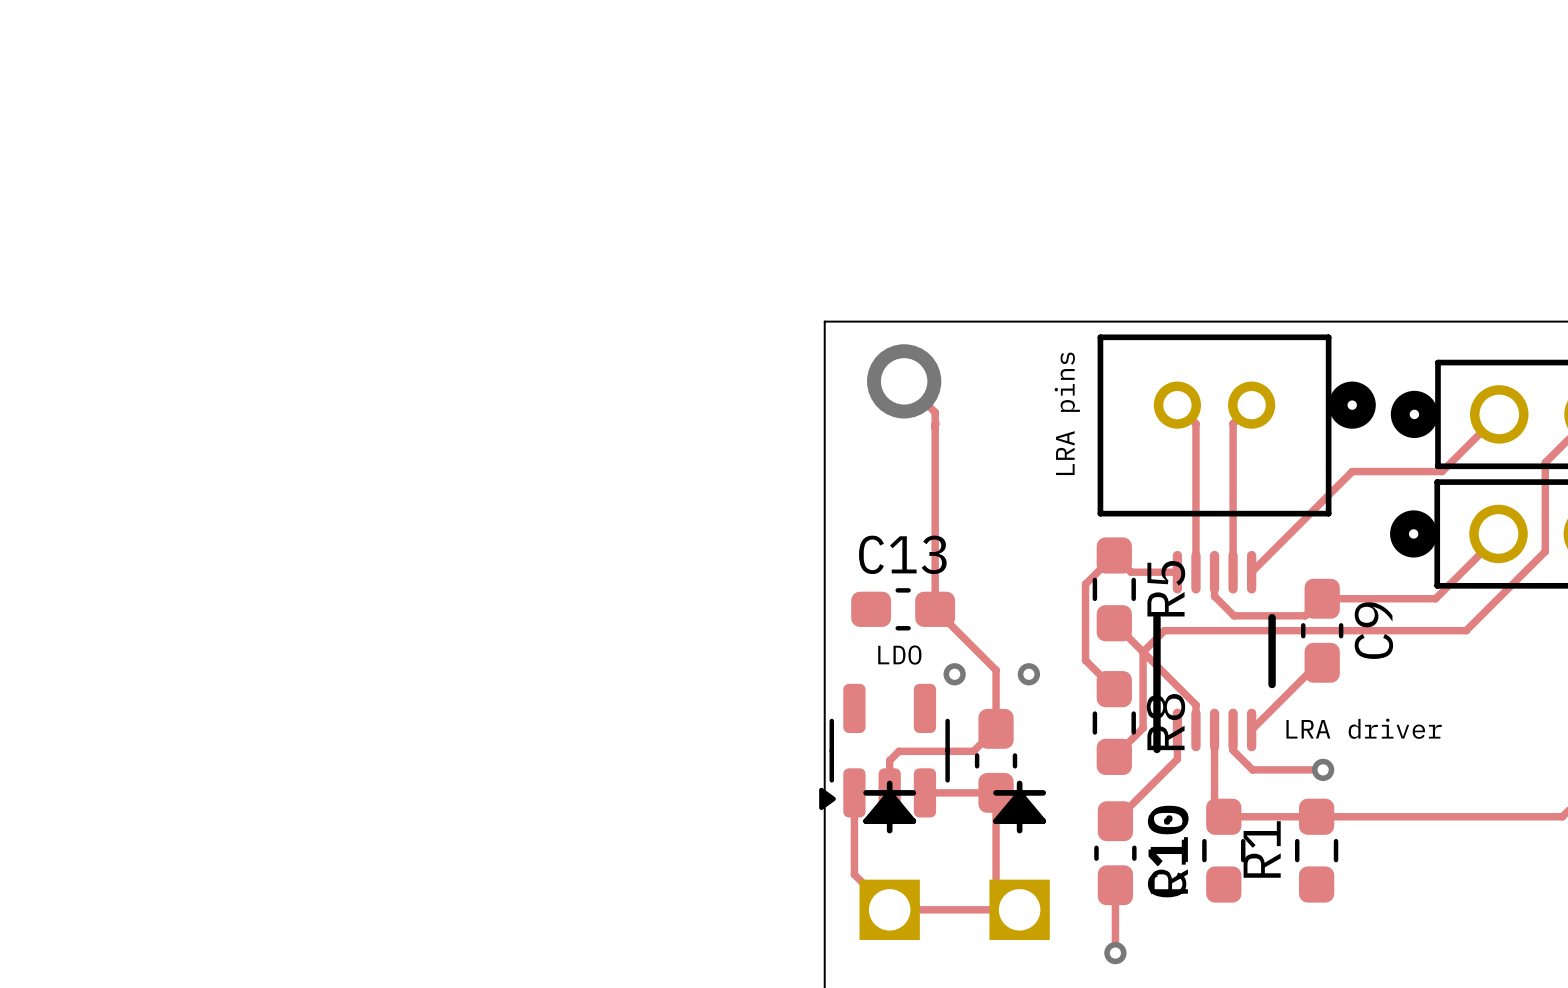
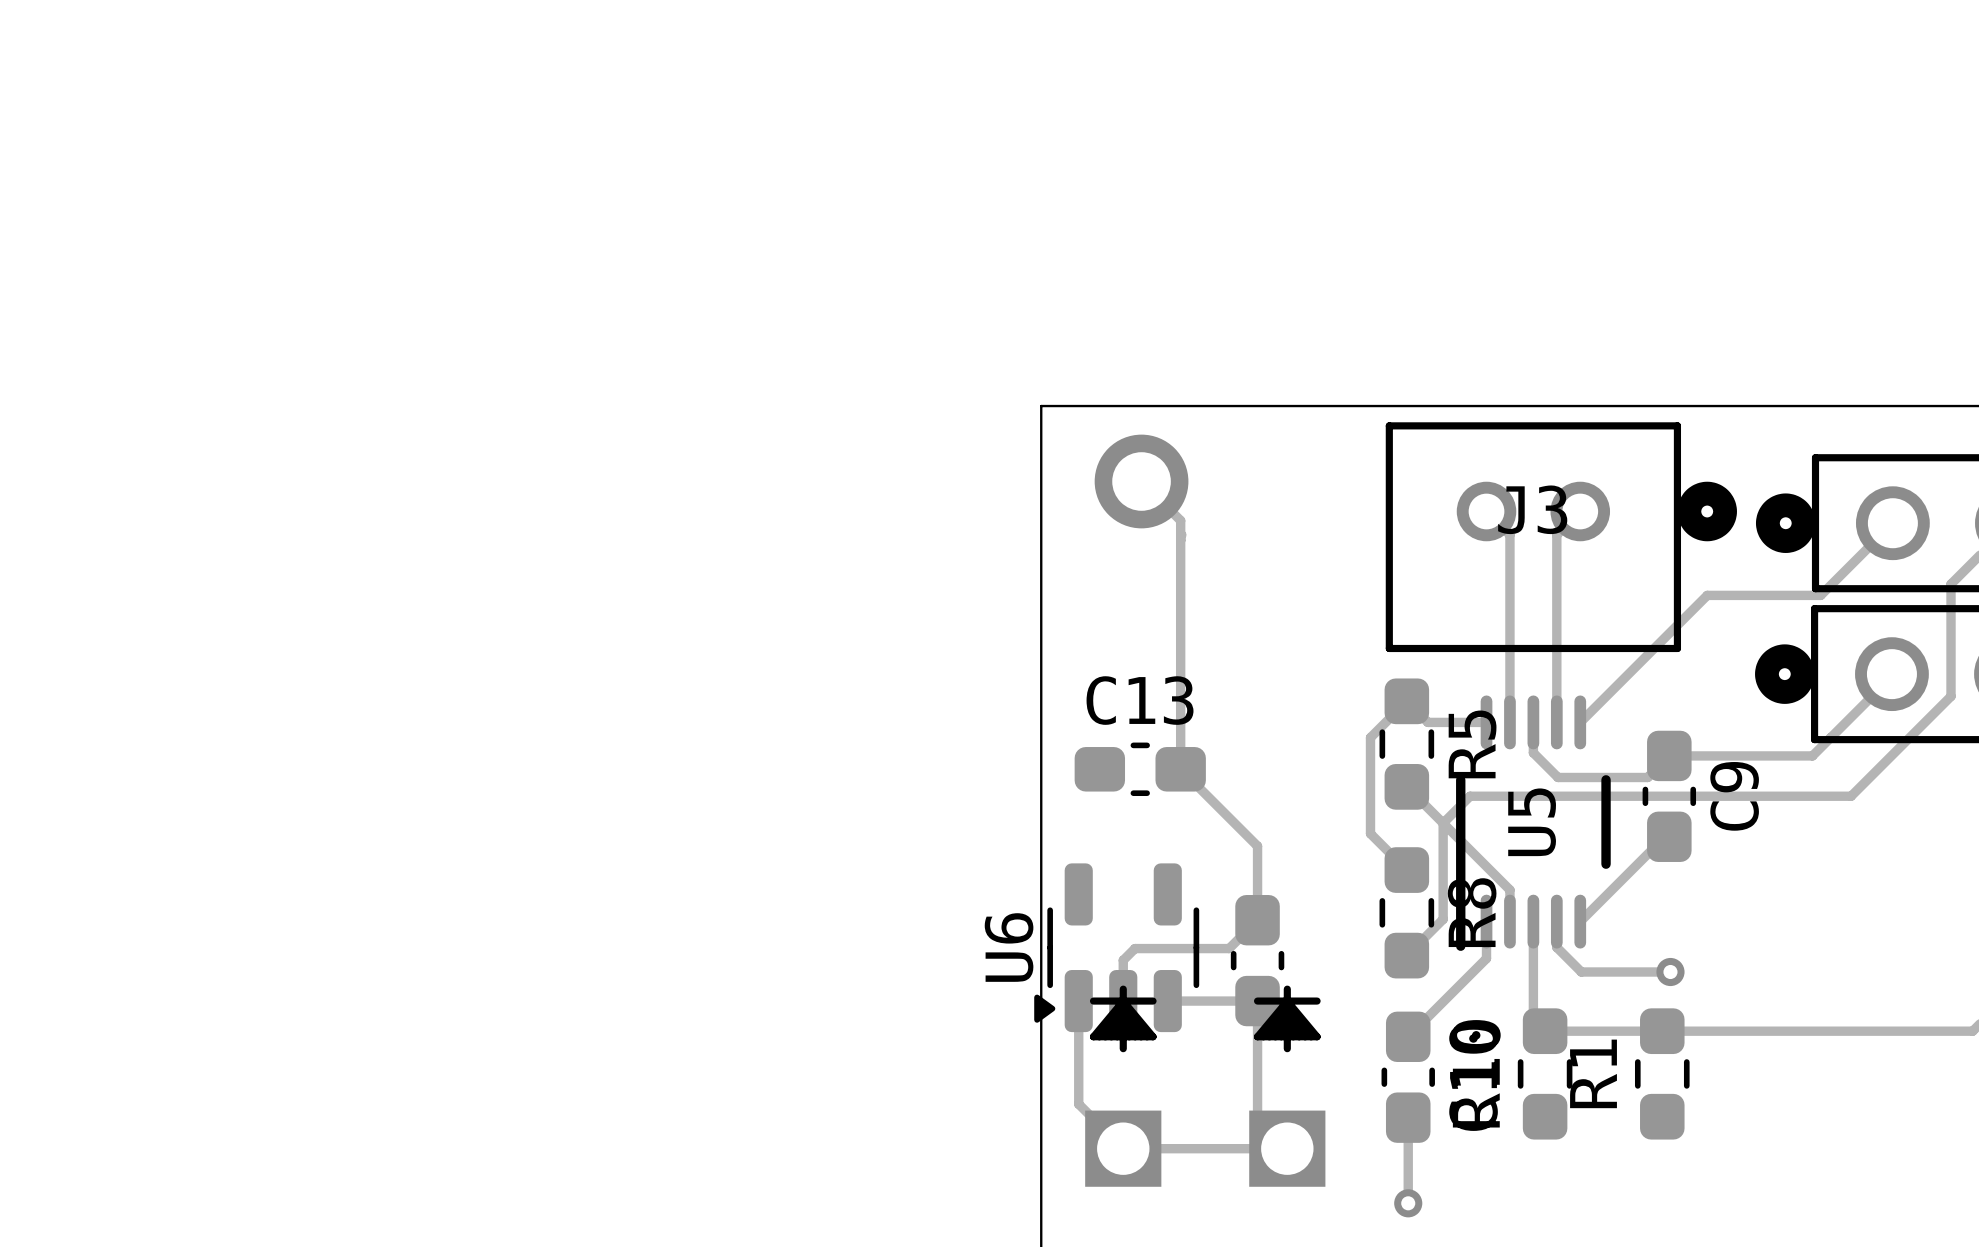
LRA pins name: LRA pins (1067, 413) -> J3 (1532, 509)
LDO name: LDO (899, 655) -> U6 (1009, 947)
via: (954, 674) -> none
via: (1028, 674) -> none
LRA driver name: LRA driver (1364, 728) -> U5 (1532, 822)

